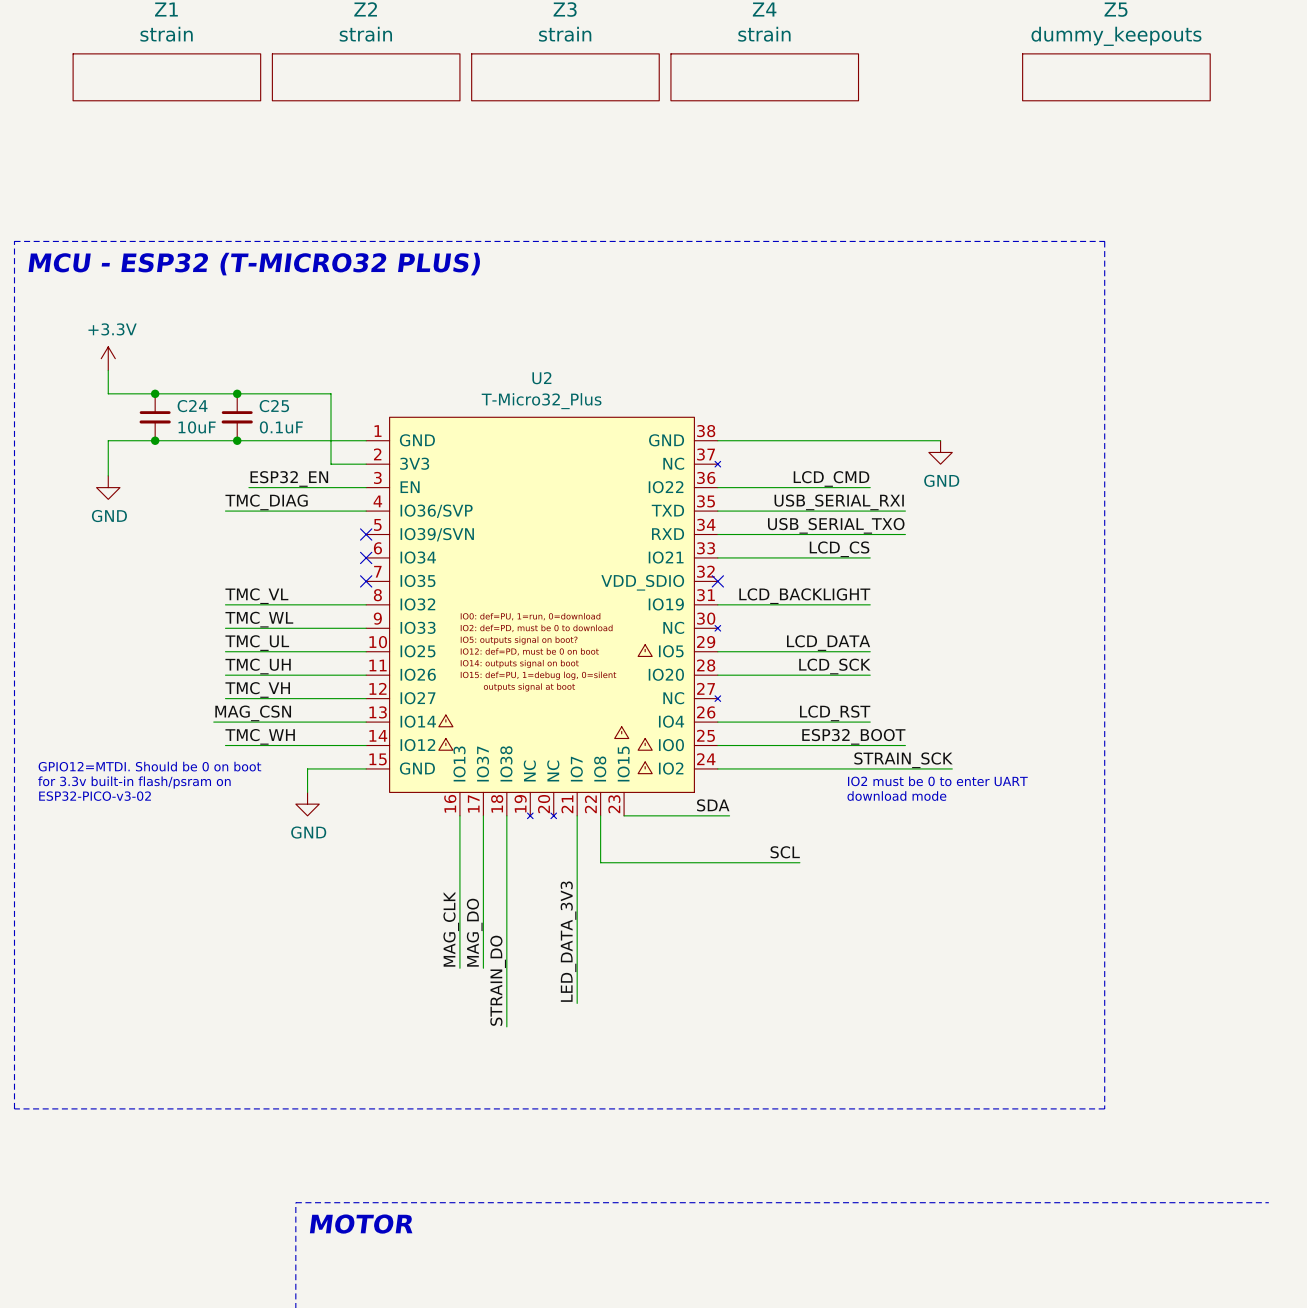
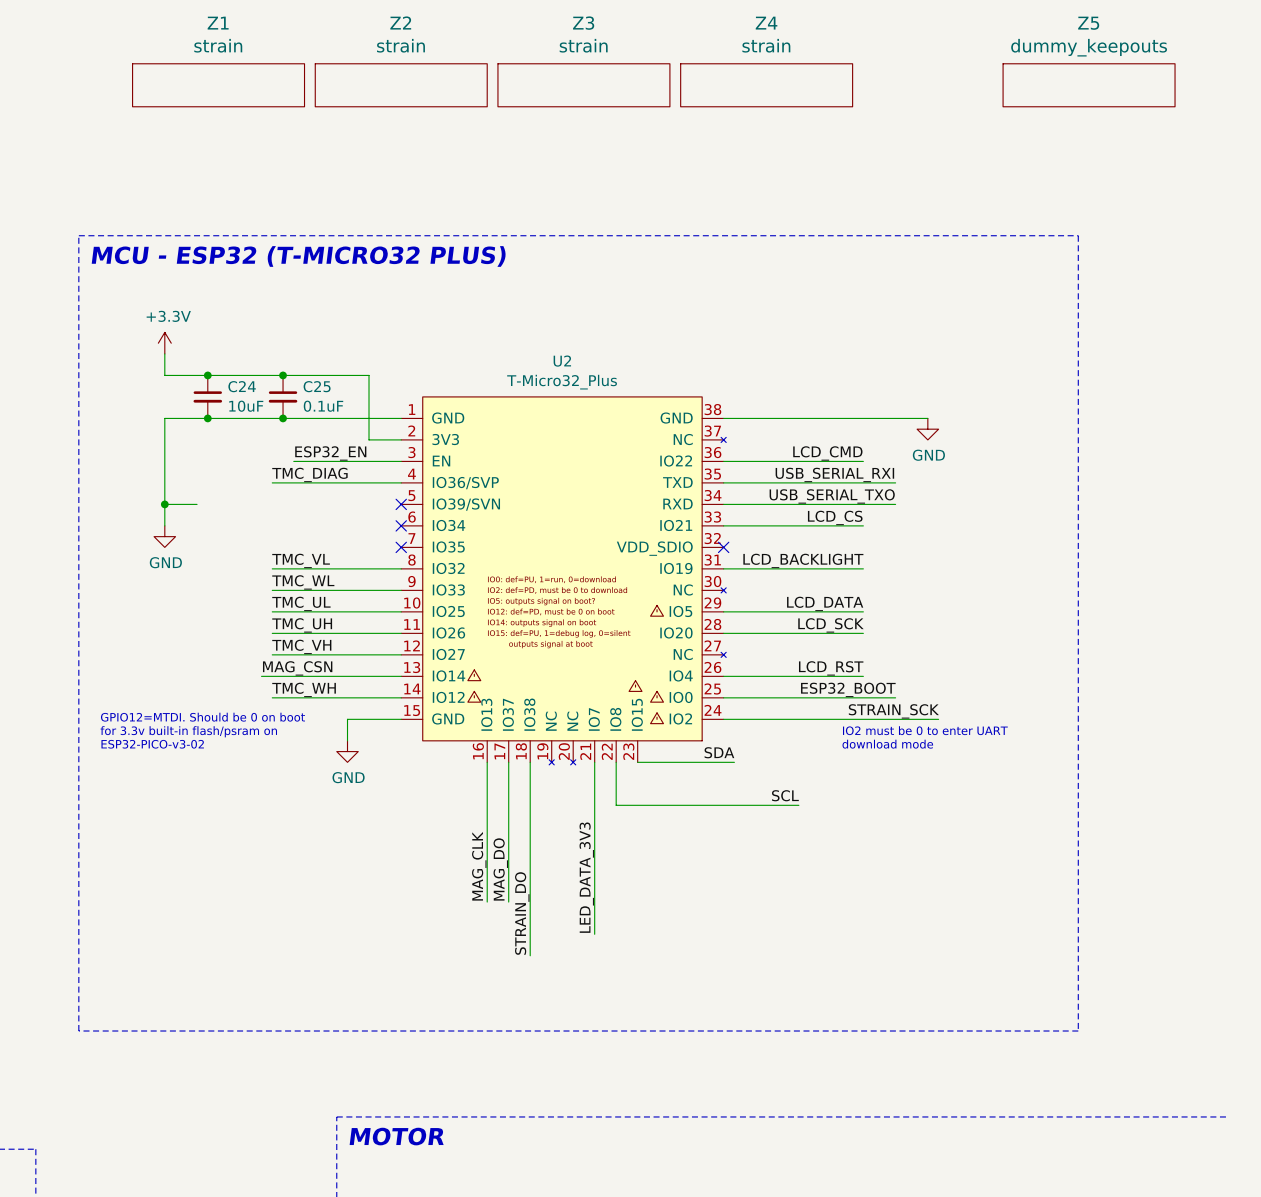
wire: none -> (164, 450) (164, 525)
power symbol position: GND (108, 487) -> GND (164, 536)
wire: none -> (164, 504) (197, 504)
junction: none -> (164, 504)

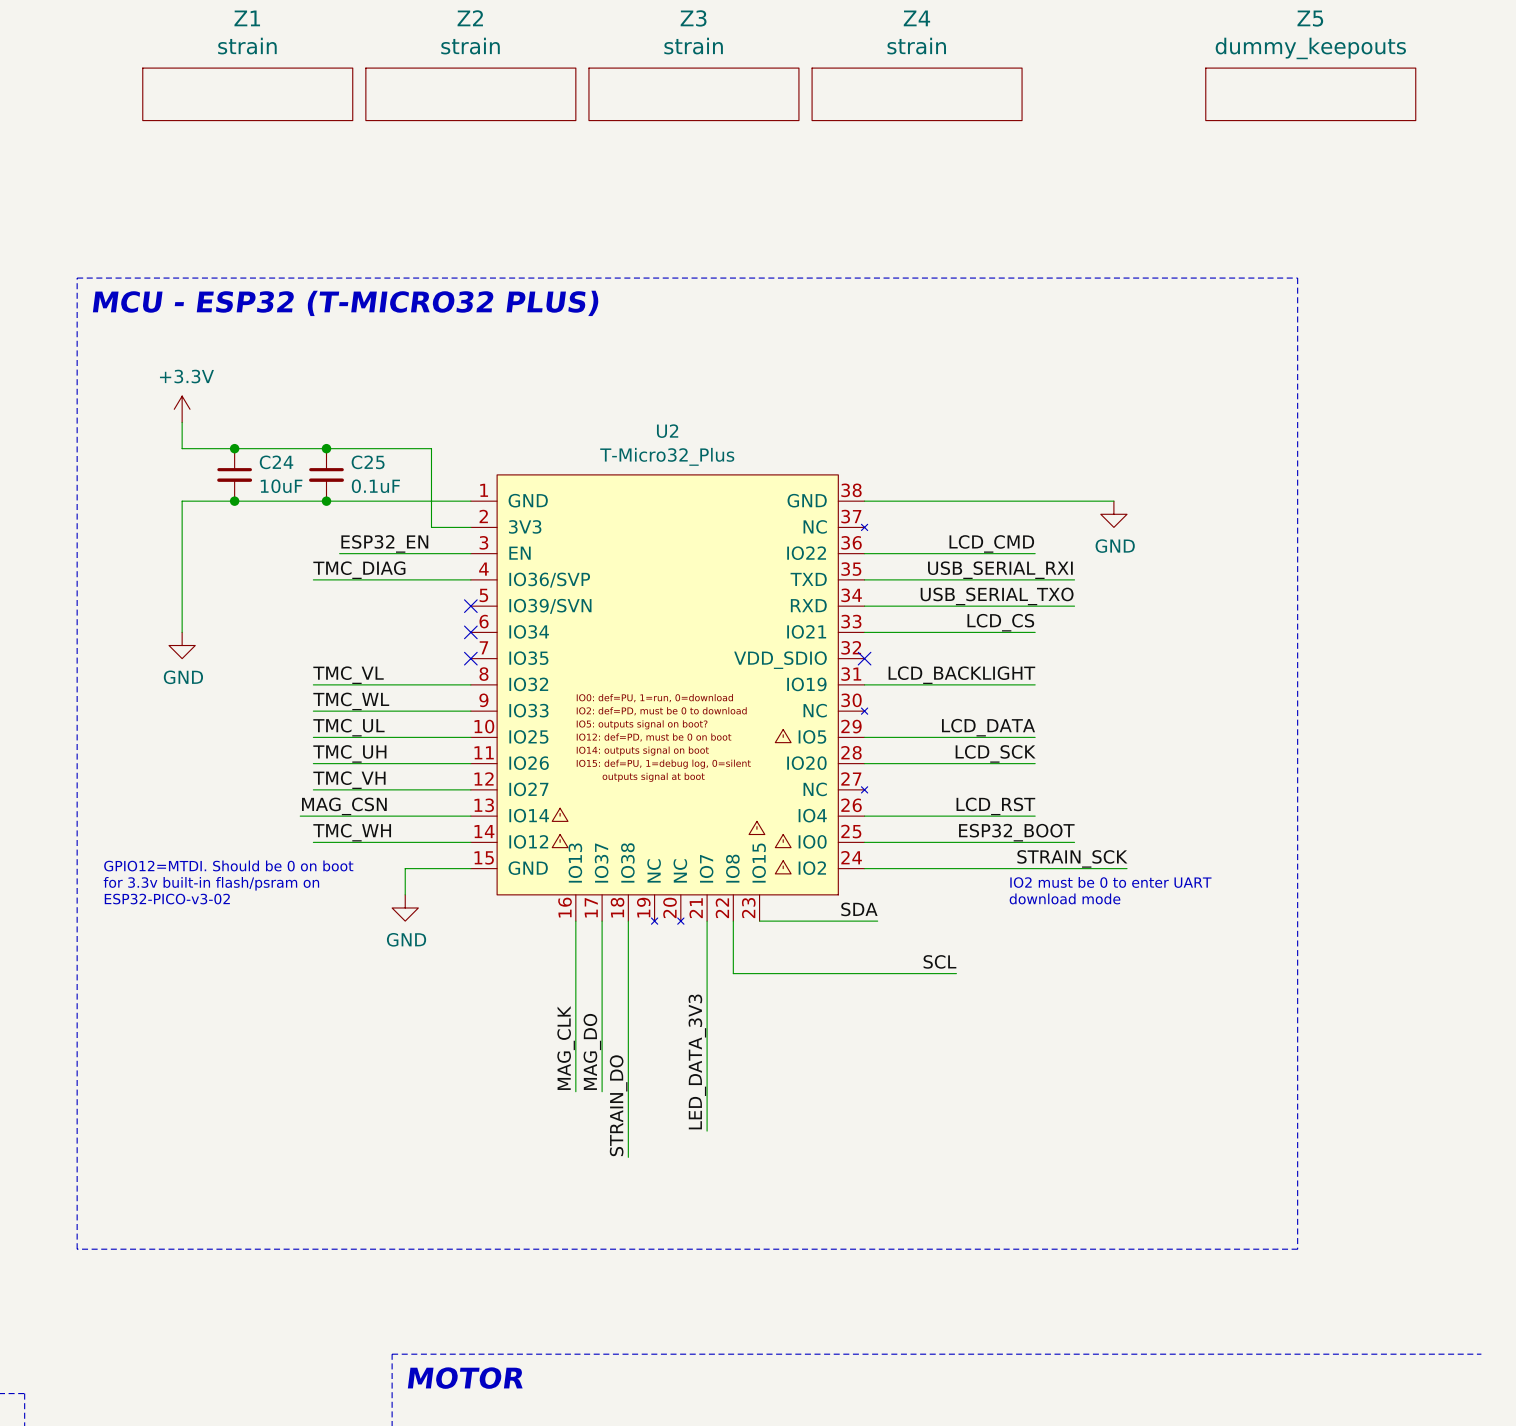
wire: (164, 504) (197, 504) -> none
junction: (164, 504) -> none

